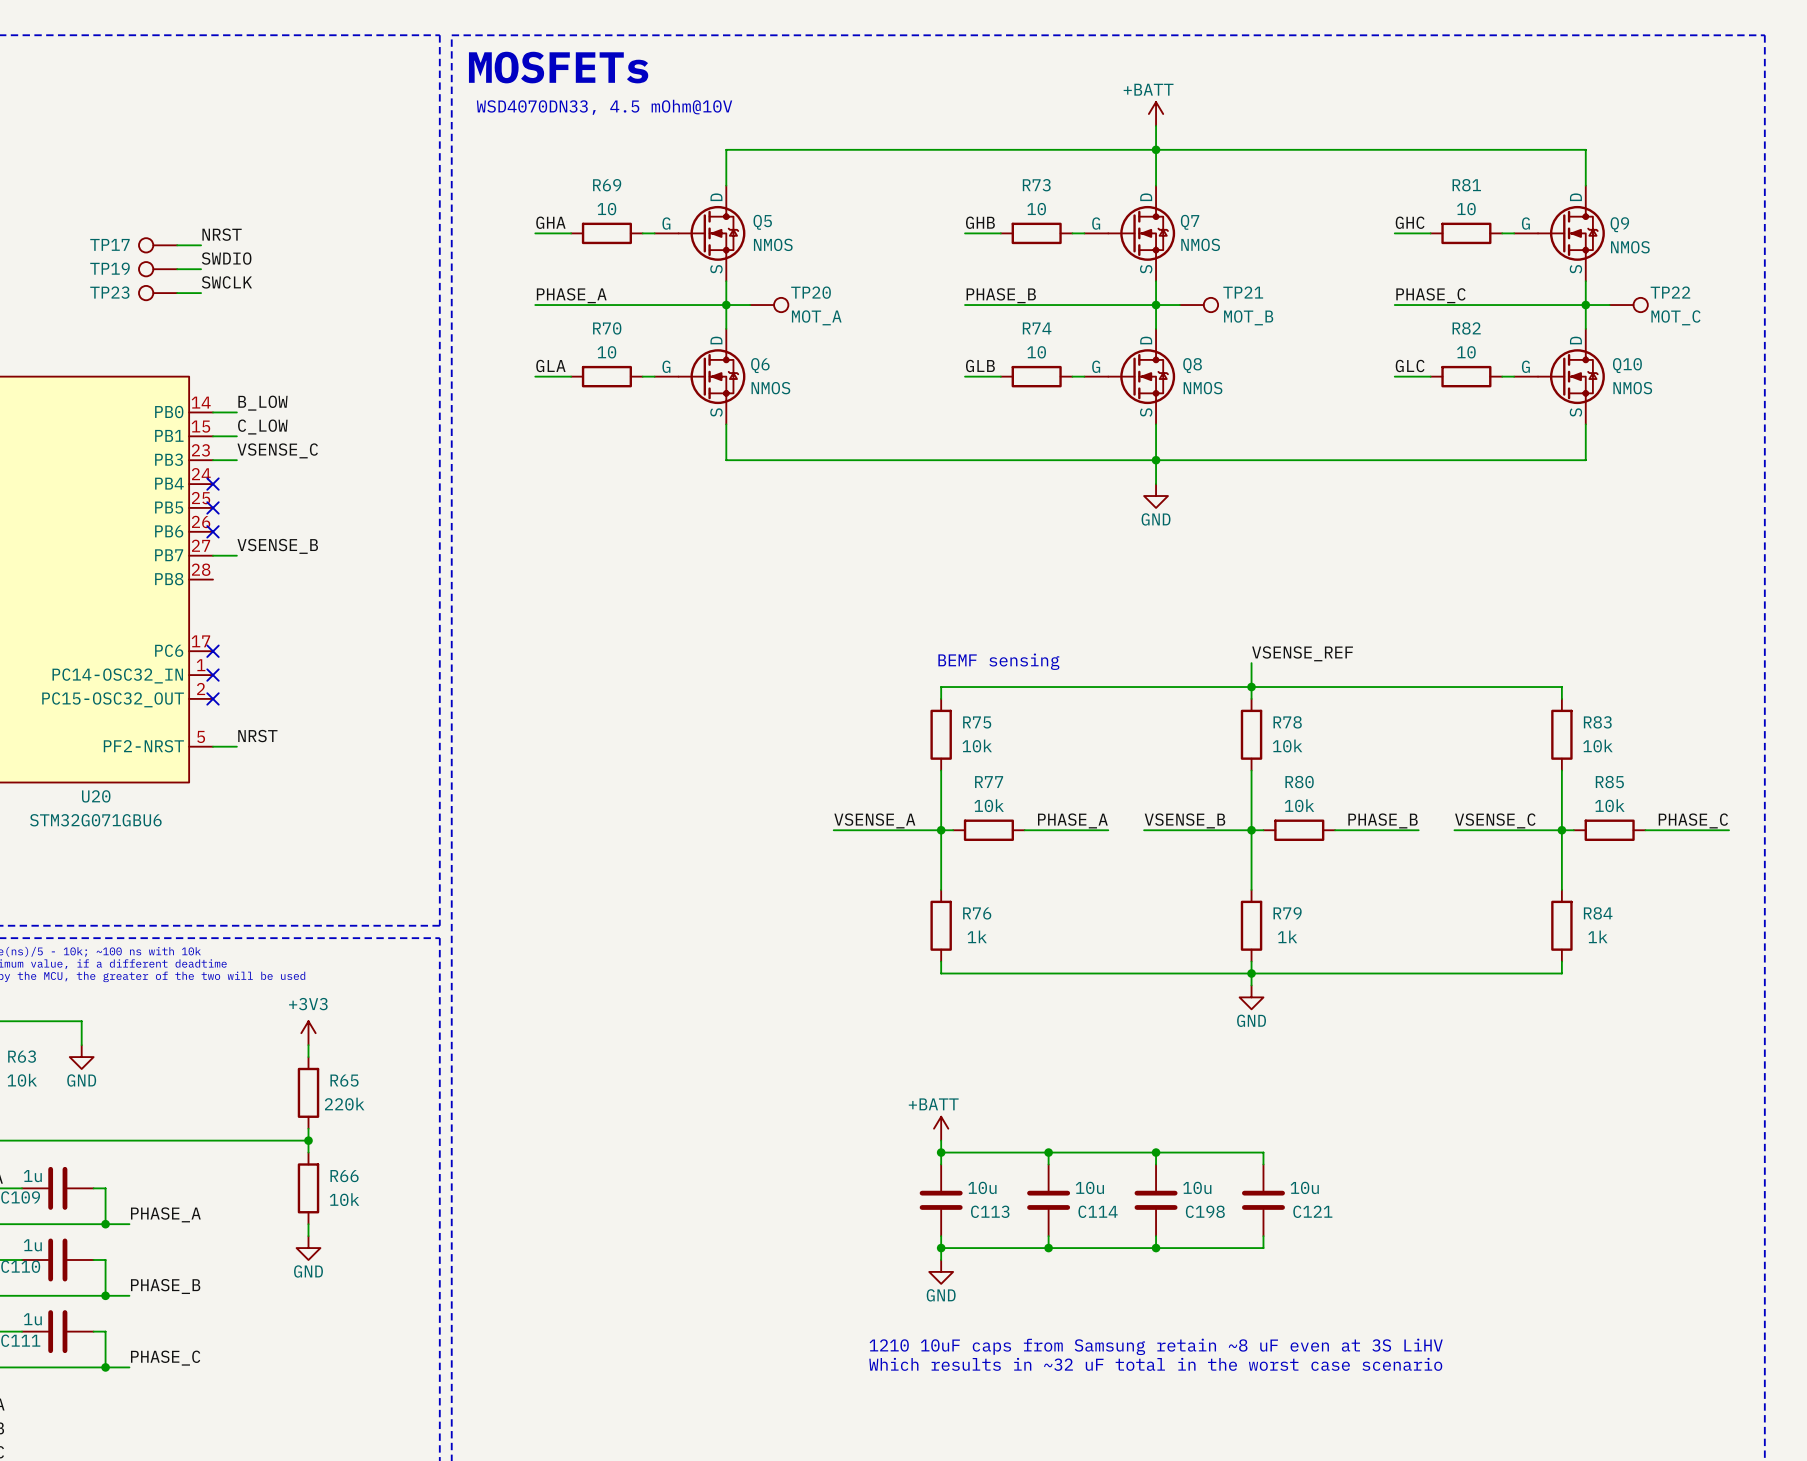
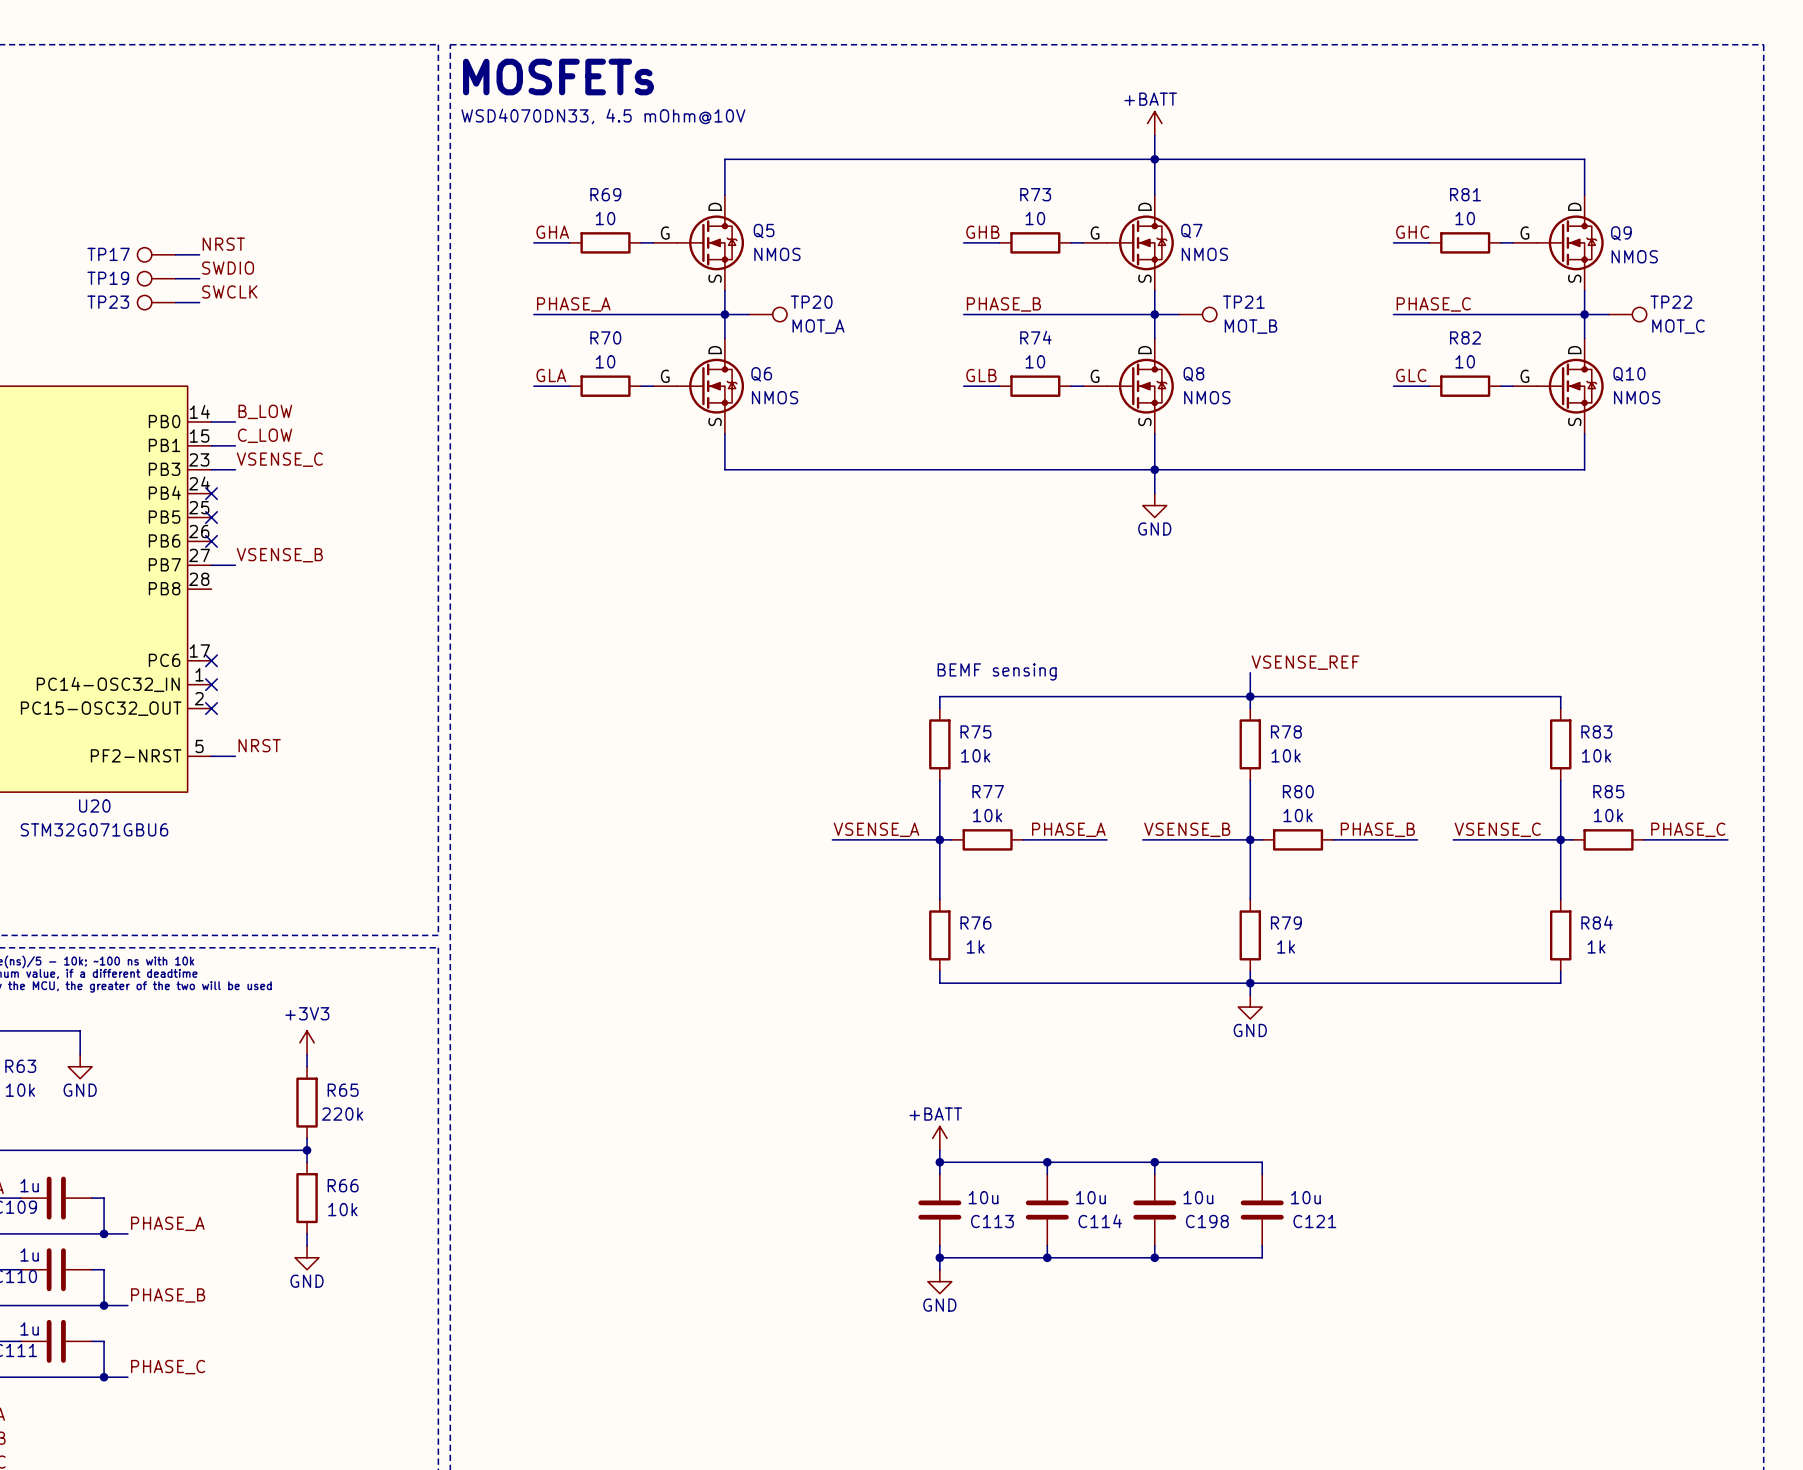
text: 1210 10uF caps from Samsung retain ~8 uF even at 3S LiHV (1156, 1346) -> none
text: Which results in ~32 uF total in the worst case scenario (1155, 1364) -> none

